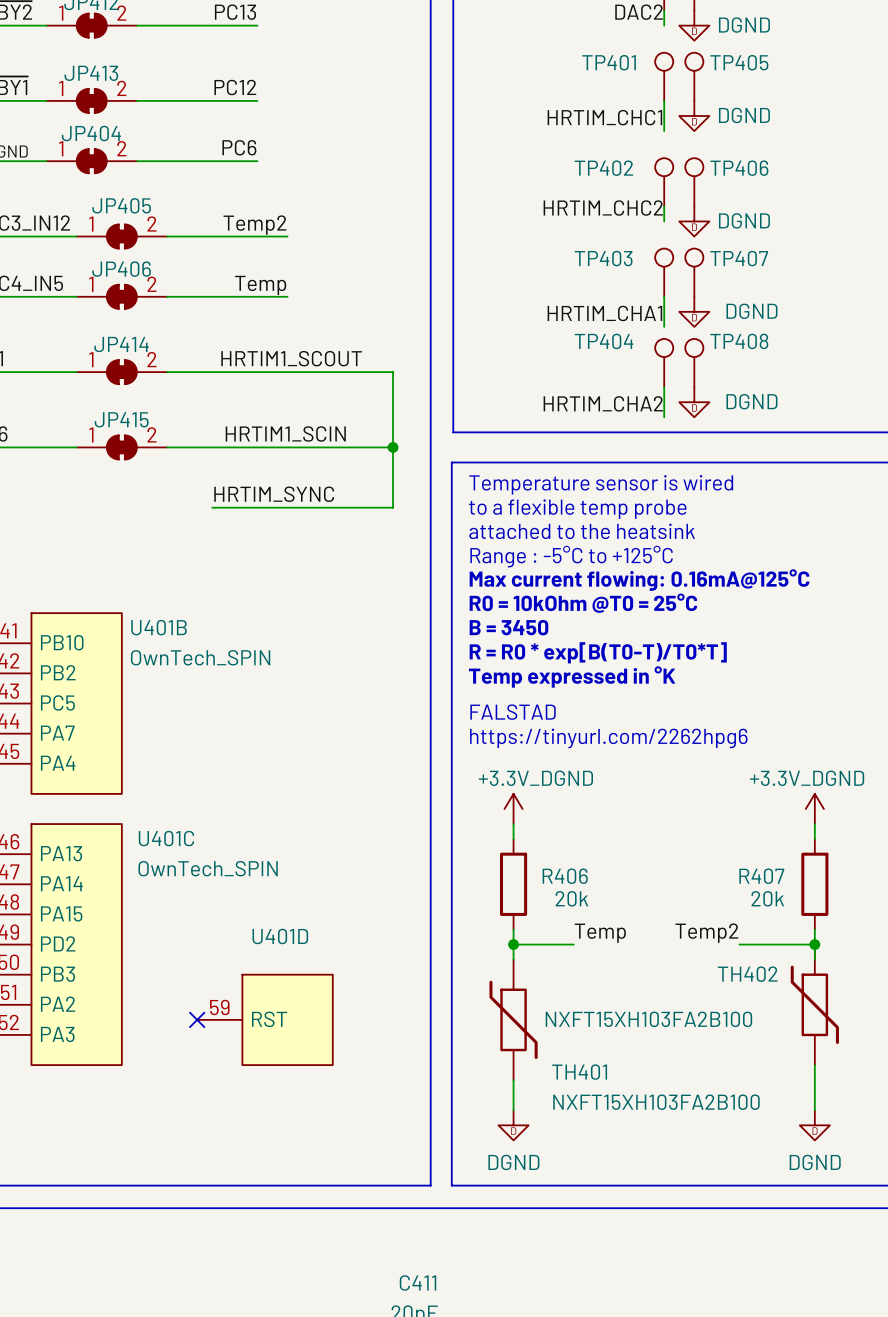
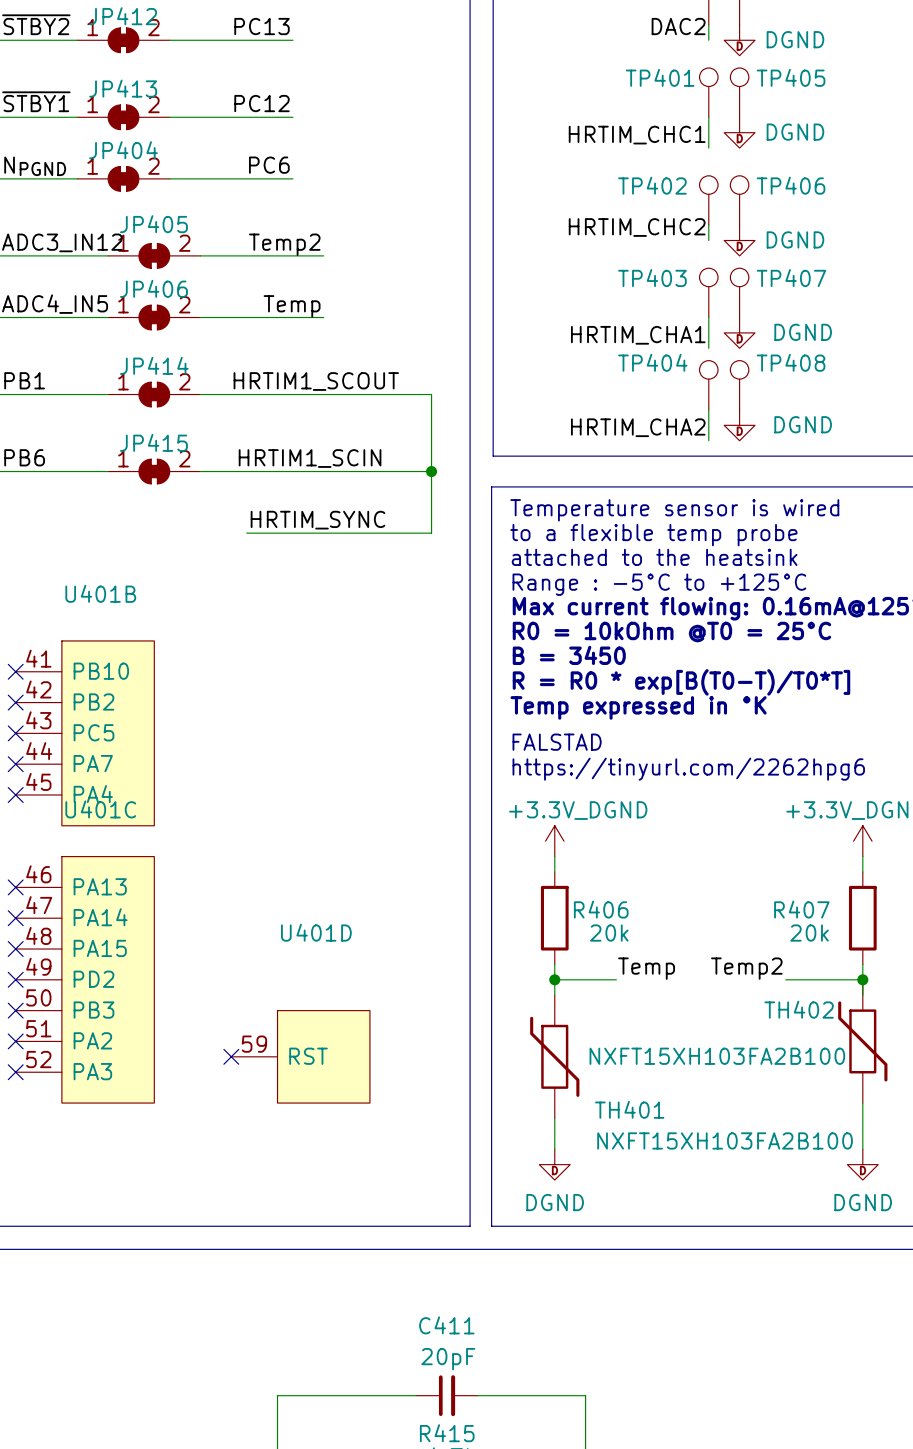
U401B name position: U401B (159, 627) -> U401B (100, 593)
U401B value: OwnTech_SPIN (200, 657) -> none
U401C name position: U401C (166, 838) -> U401C (100, 809)
U401C value: OwnTech_SPIN (208, 868) -> none
U401D name position: U401D (280, 936) -> U401D (316, 932)

